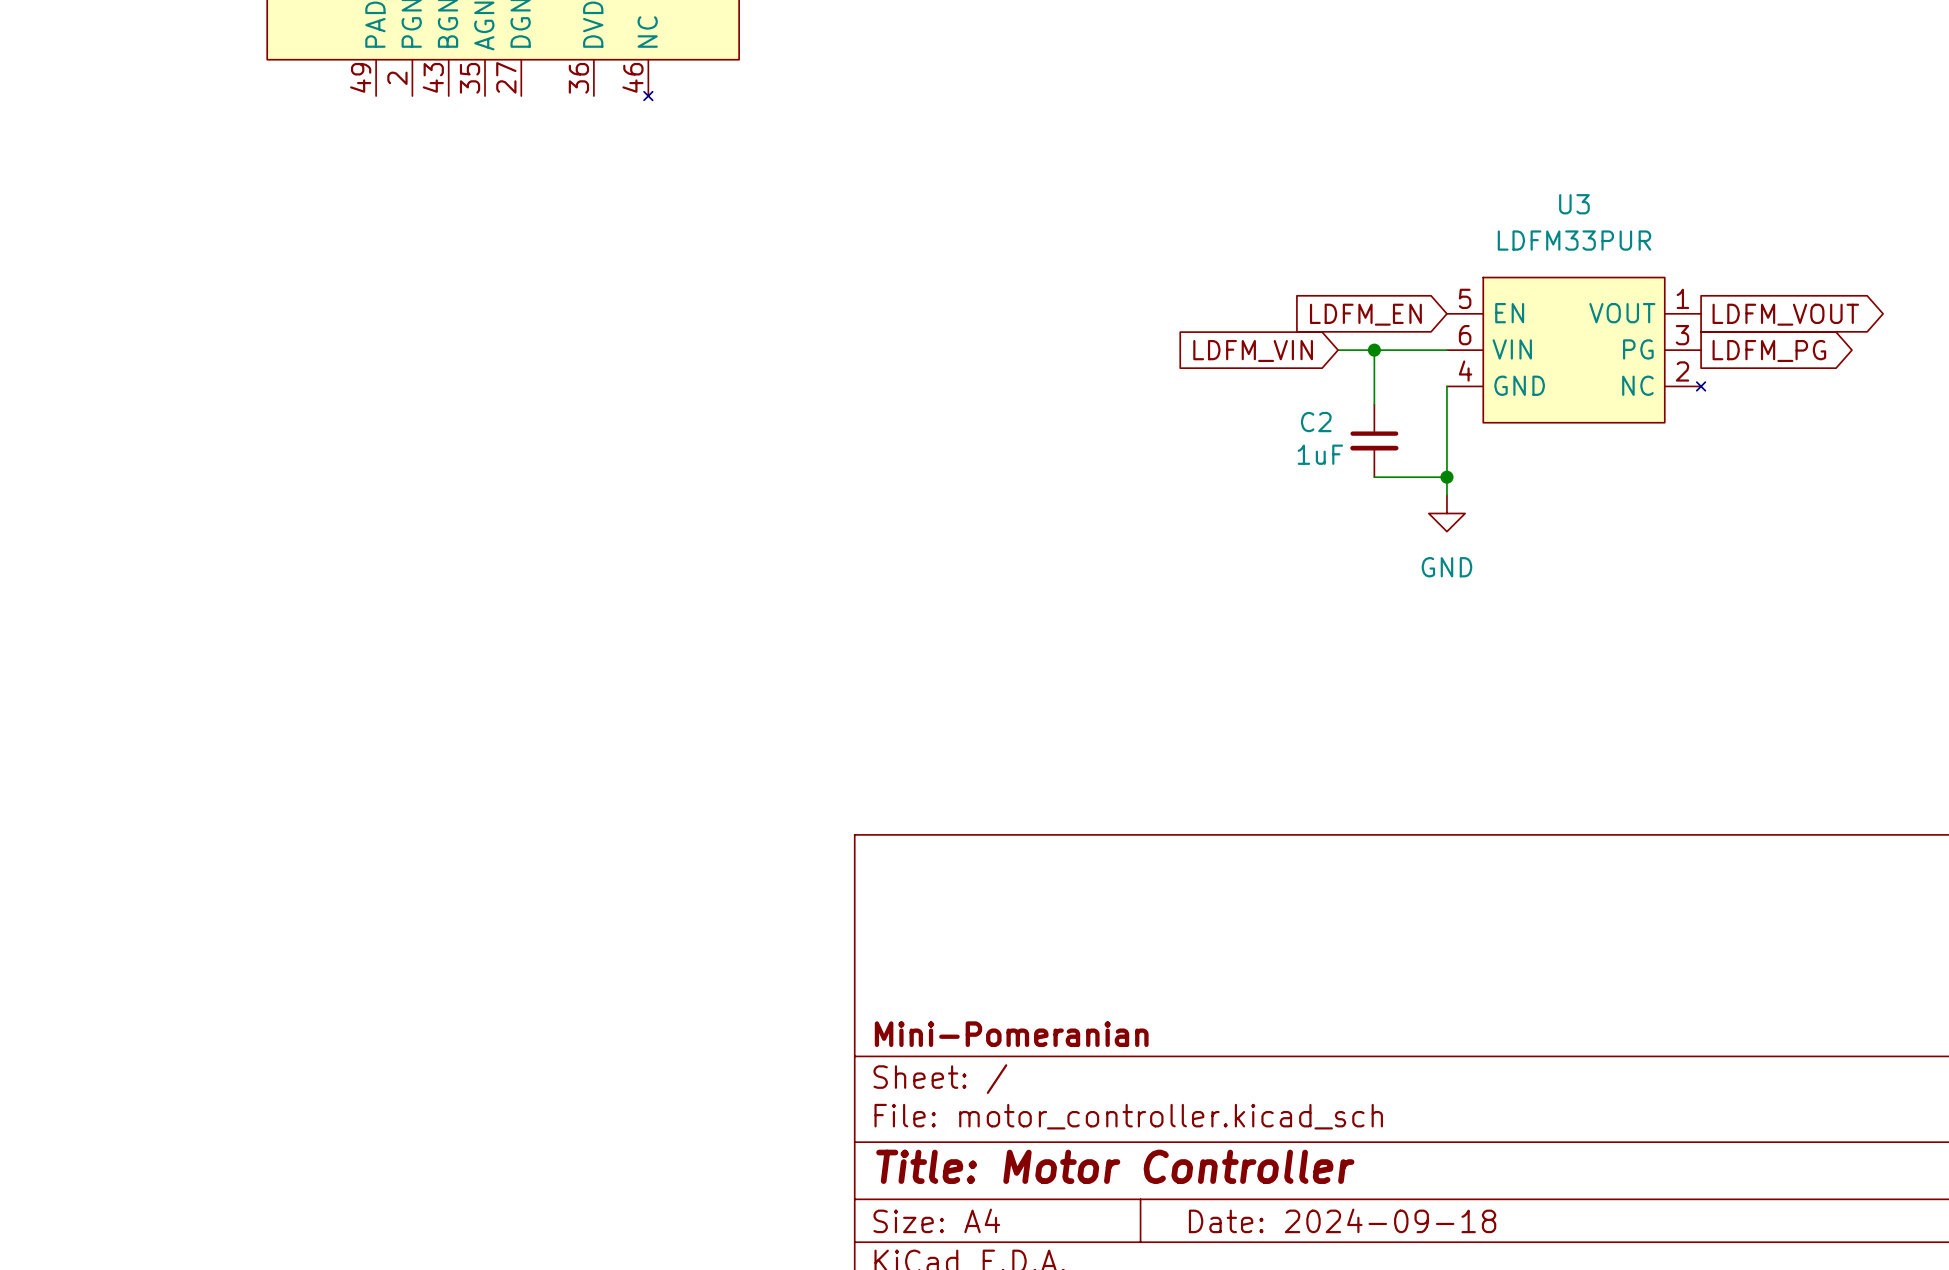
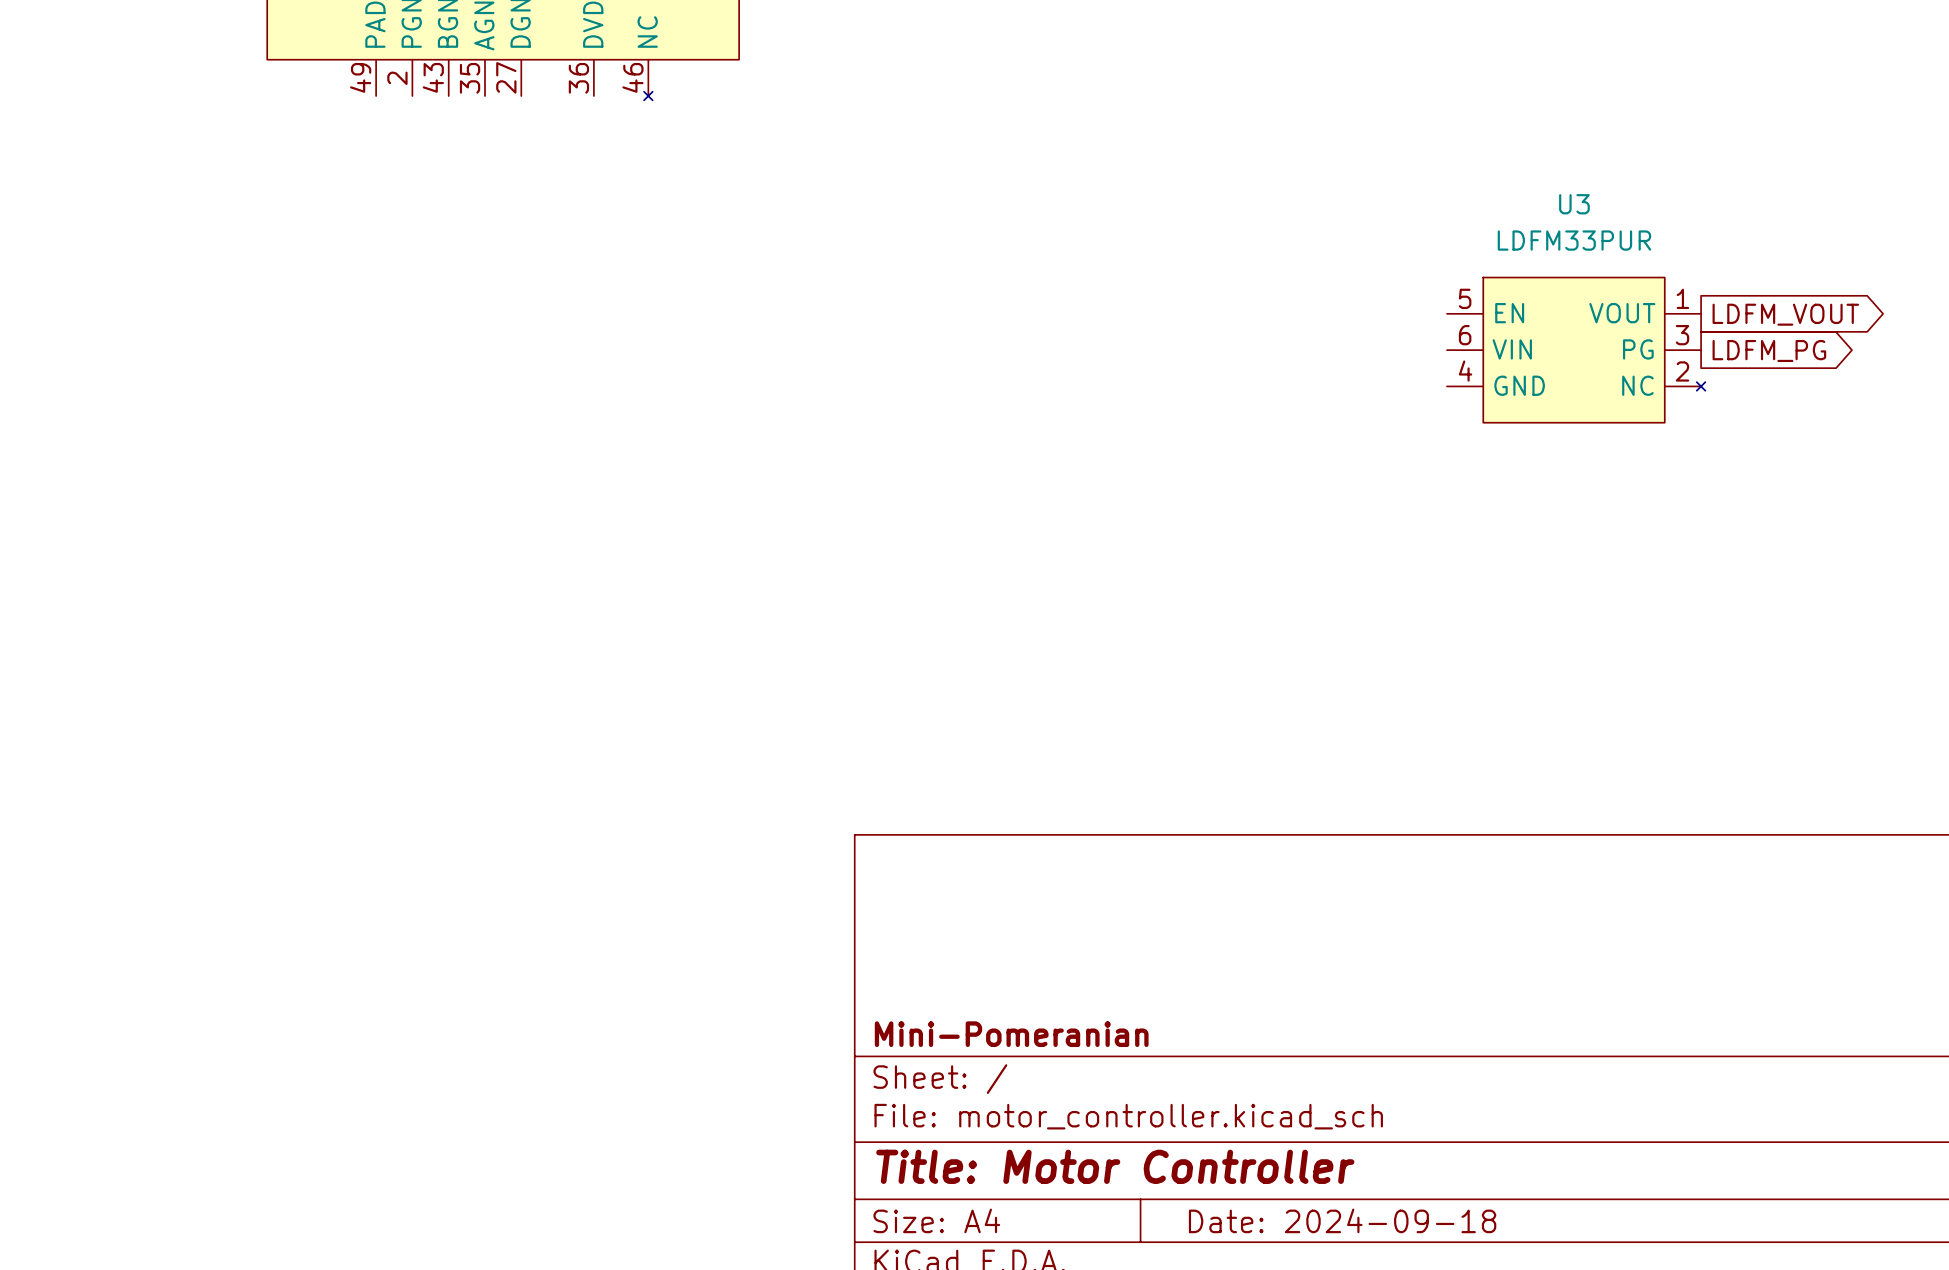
global label: LDFM_EN (1365, 314) -> none
global label: LDFM_VIN (1253, 350) -> none
wire: (1338, 350) (1446, 350) -> none
wire: (1374, 350) (1374, 404) -> none
junction: (1374, 350) -> none
wire: (1446, 386) (1446, 495) -> none
C2: 1uF (1374, 440) -> none
wire: (1374, 477) (1446, 477) -> none
junction: (1446, 477) -> none
power symbol: GND (1446, 513) -> none

